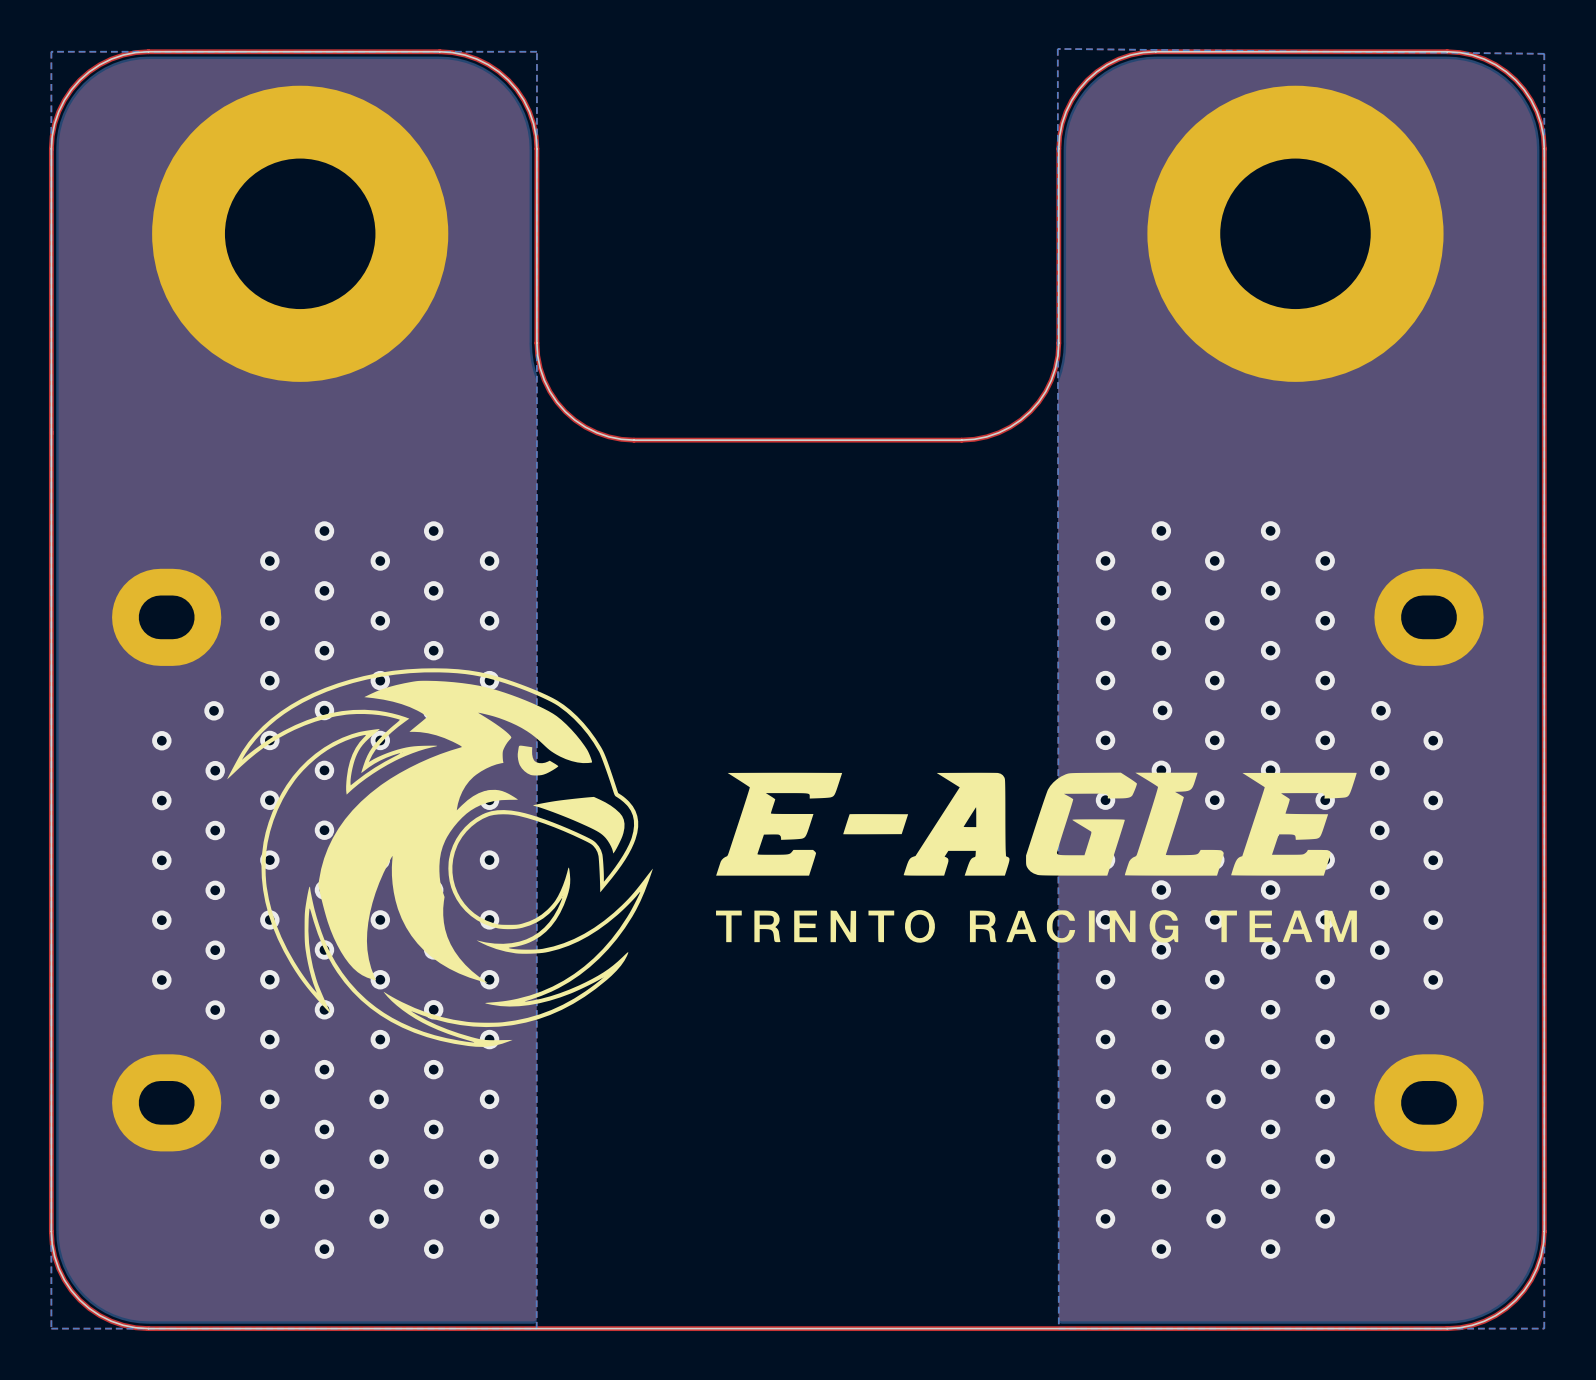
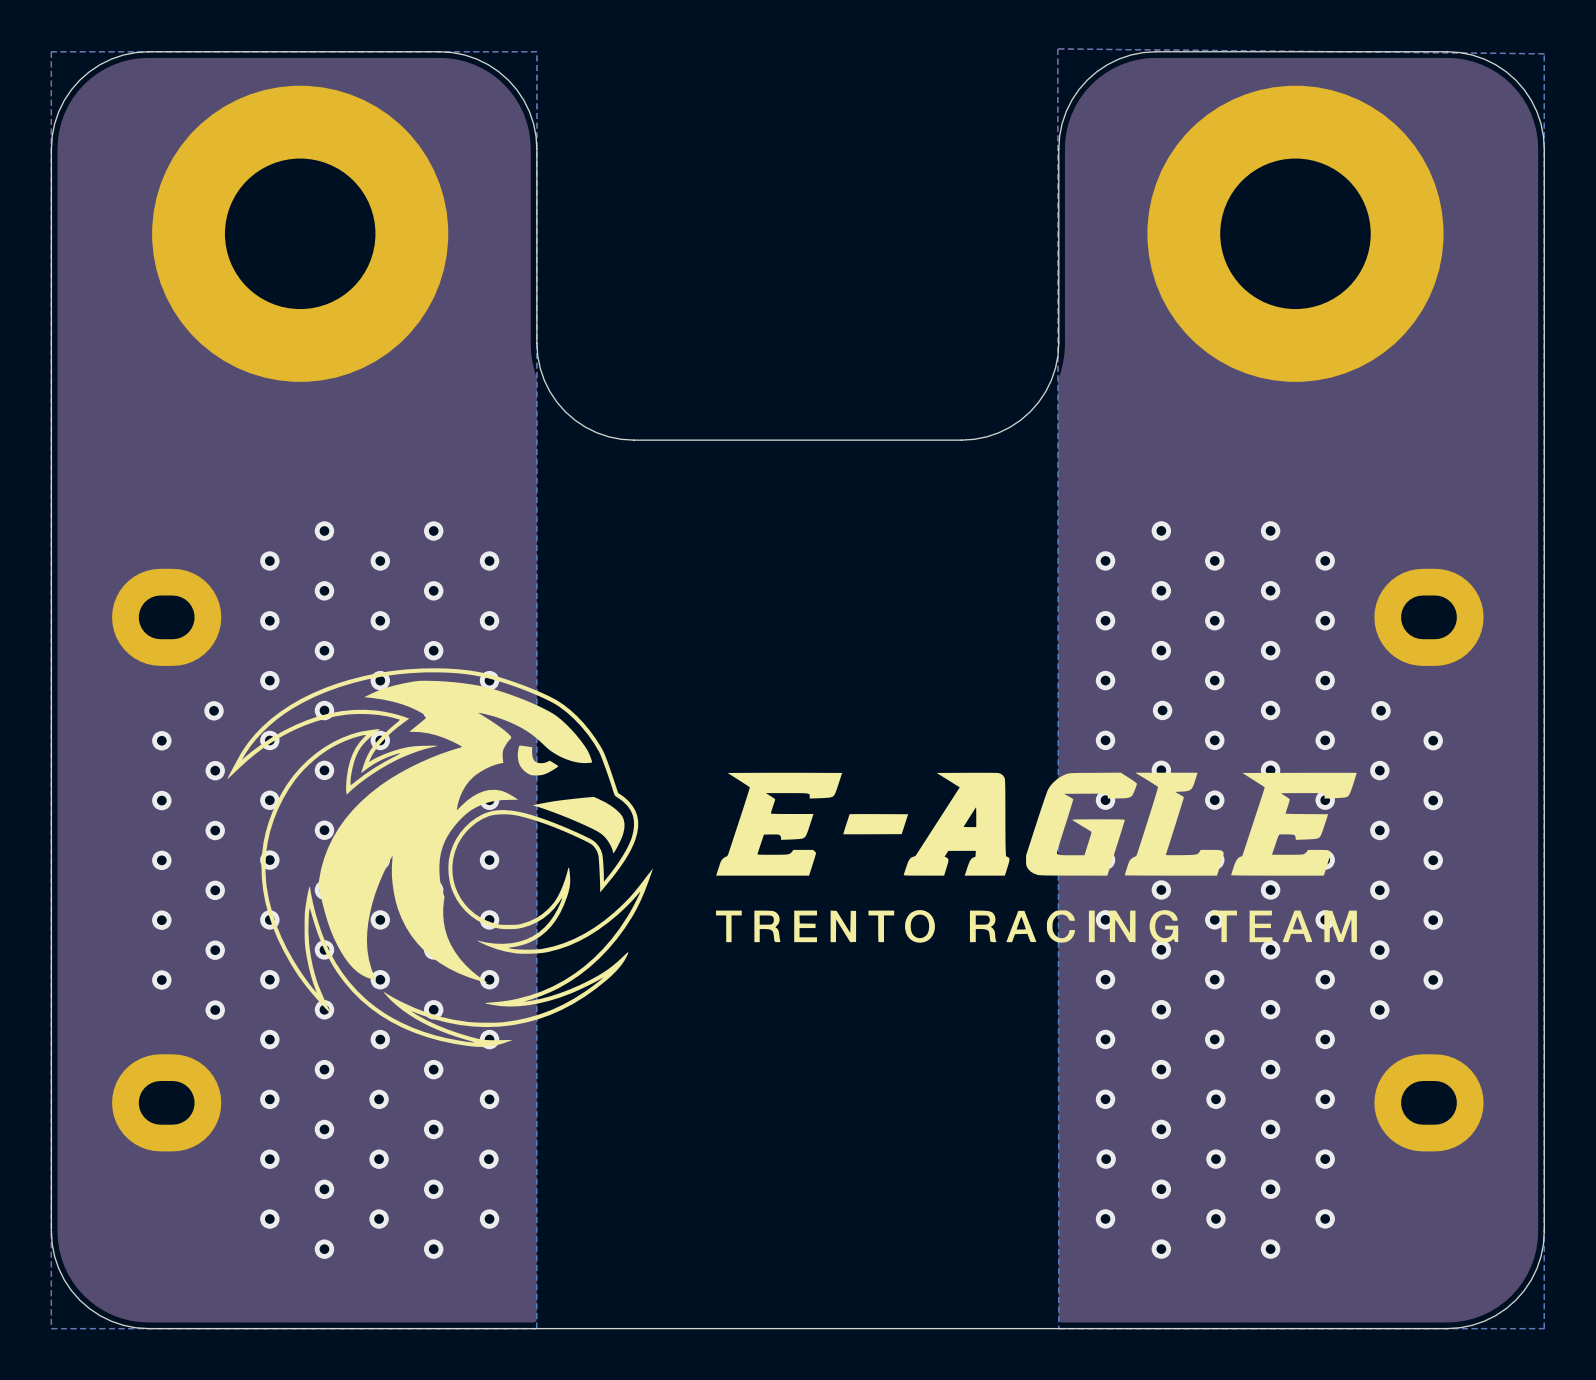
top track: (1447, 51) (1155, 51) (1130, 55) (1107, 64) (1096, 71) (1078, 89) (1071, 100) (1066, 111) (1059, 136) (1058, 343) (1057, 355) (1051, 380) (1038, 402) (1030, 411) (1010, 427) (986, 436) (961, 440) (633, 440) (608, 436) (596, 432) (574, 420) (556, 402) (549, 391) (544, 380) (537, 355) (536, 148) (533, 123) (523, 100) (508, 80) (488, 64) (476, 59) (452, 52) (439, 51) (148, 51) (135, 52) (111, 59) (99, 64) (79, 80) (64, 100) (58, 111) (54, 123) (51, 148) (51, 1231) (52, 1244) (58, 1268) (71, 1290) (79, 1300) (99, 1315) (111, 1321) (135, 1327) (148, 1328) (1447, 1328) (1472, 1325) (1484, 1321) (1506, 1308) (1515, 1300) (1531, 1280) (1536, 1268) (1540, 1256) (1544, 1231) (1544, 148) (1543, 136) (1536, 111) (1524, 89) (1515, 80) (1495, 64) (1484, 59) (1459, 52) (1447, 51) -> none

